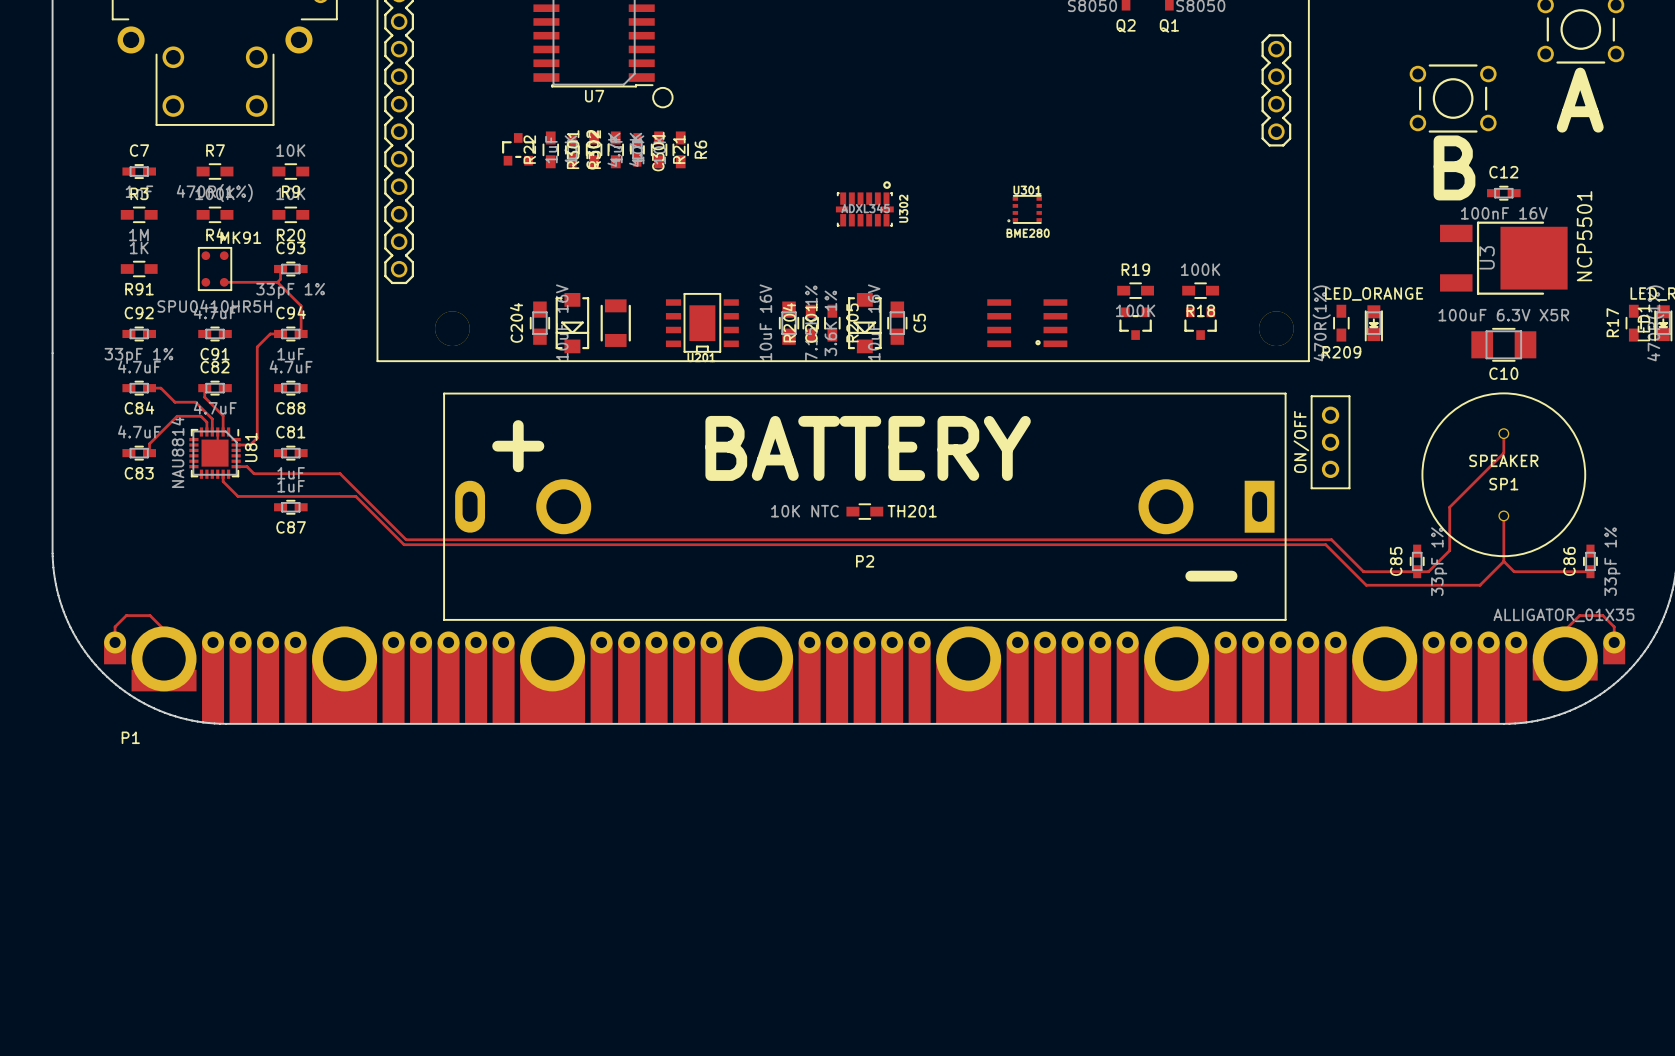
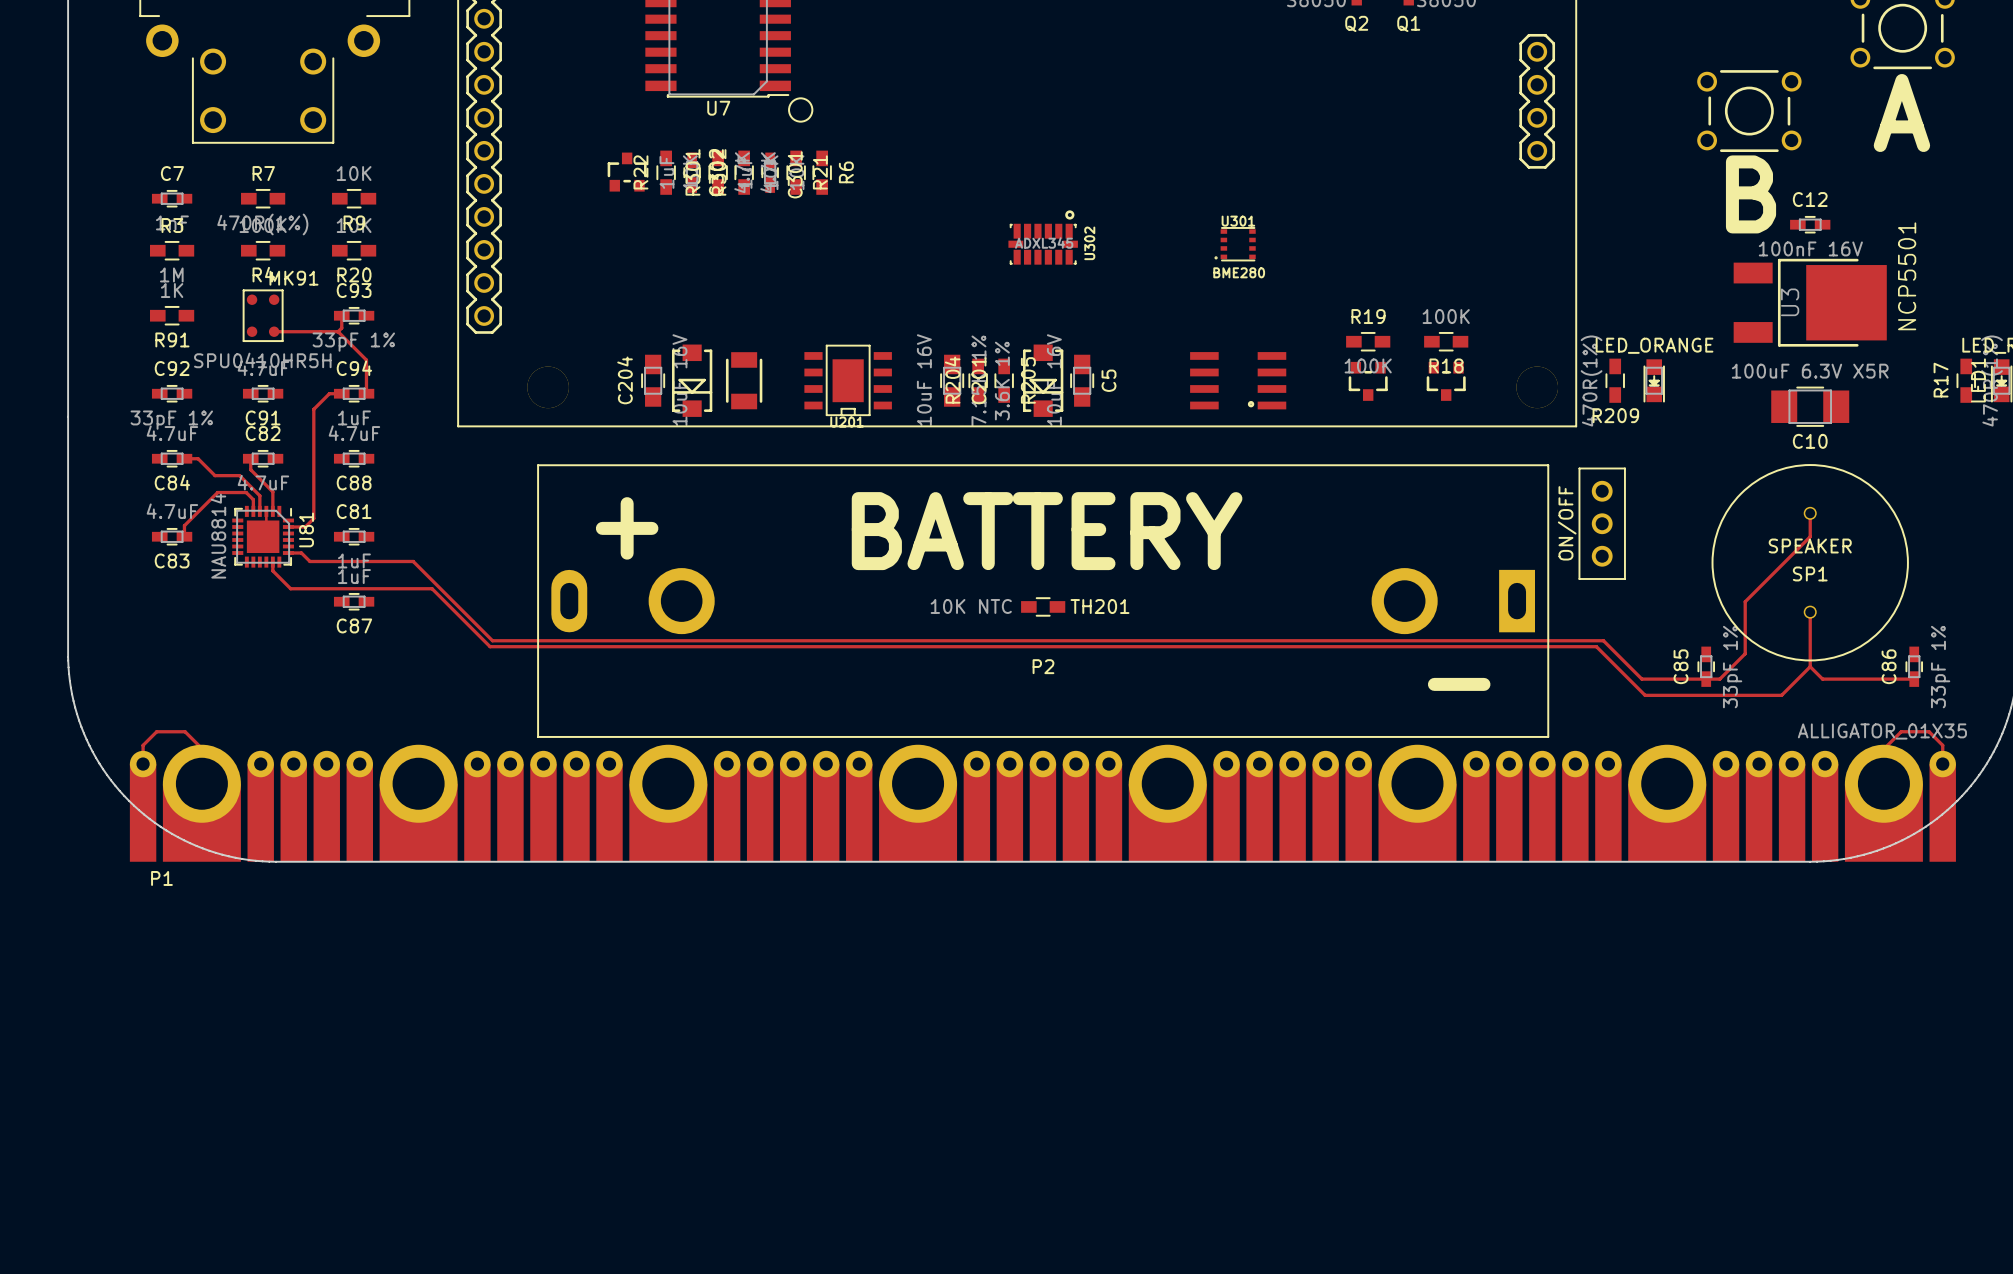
P1 footprint: [104, 626, 1626, 724] -> [129, 744, 1956, 862]

